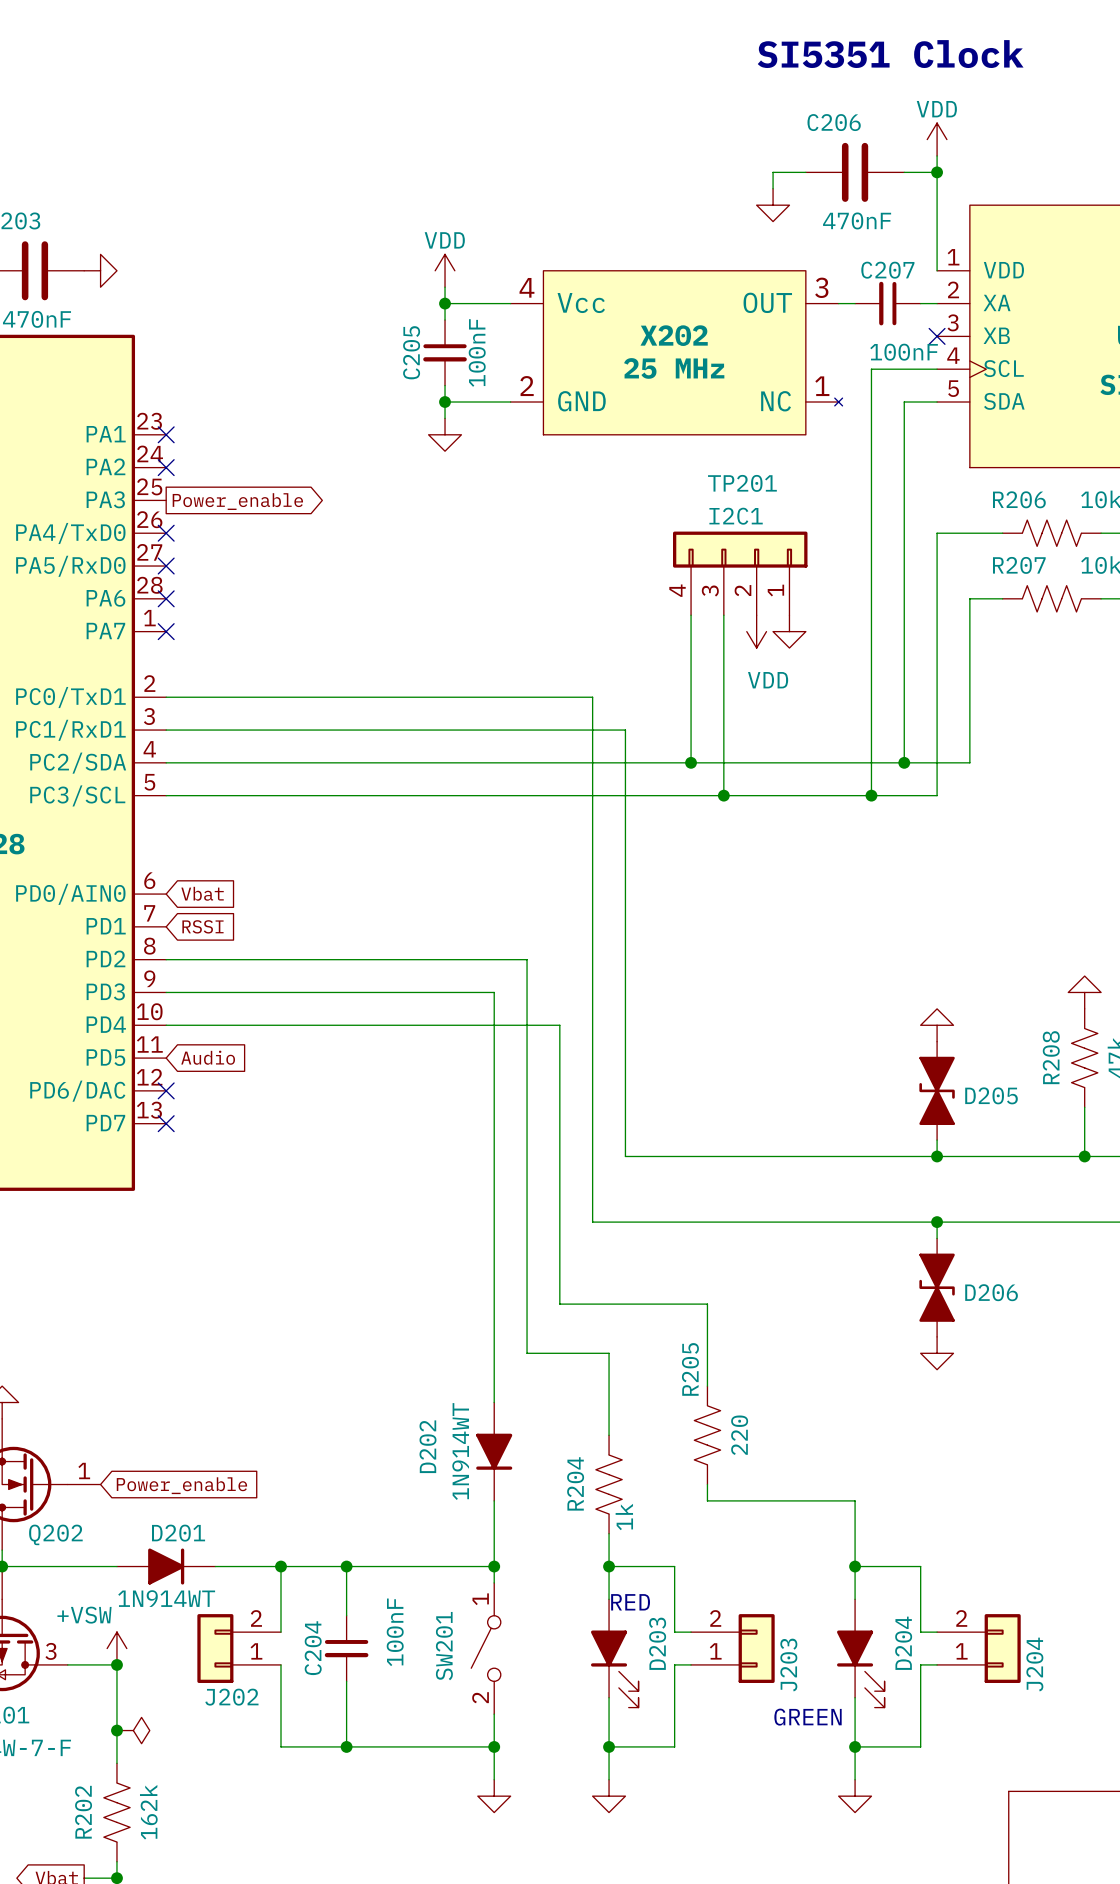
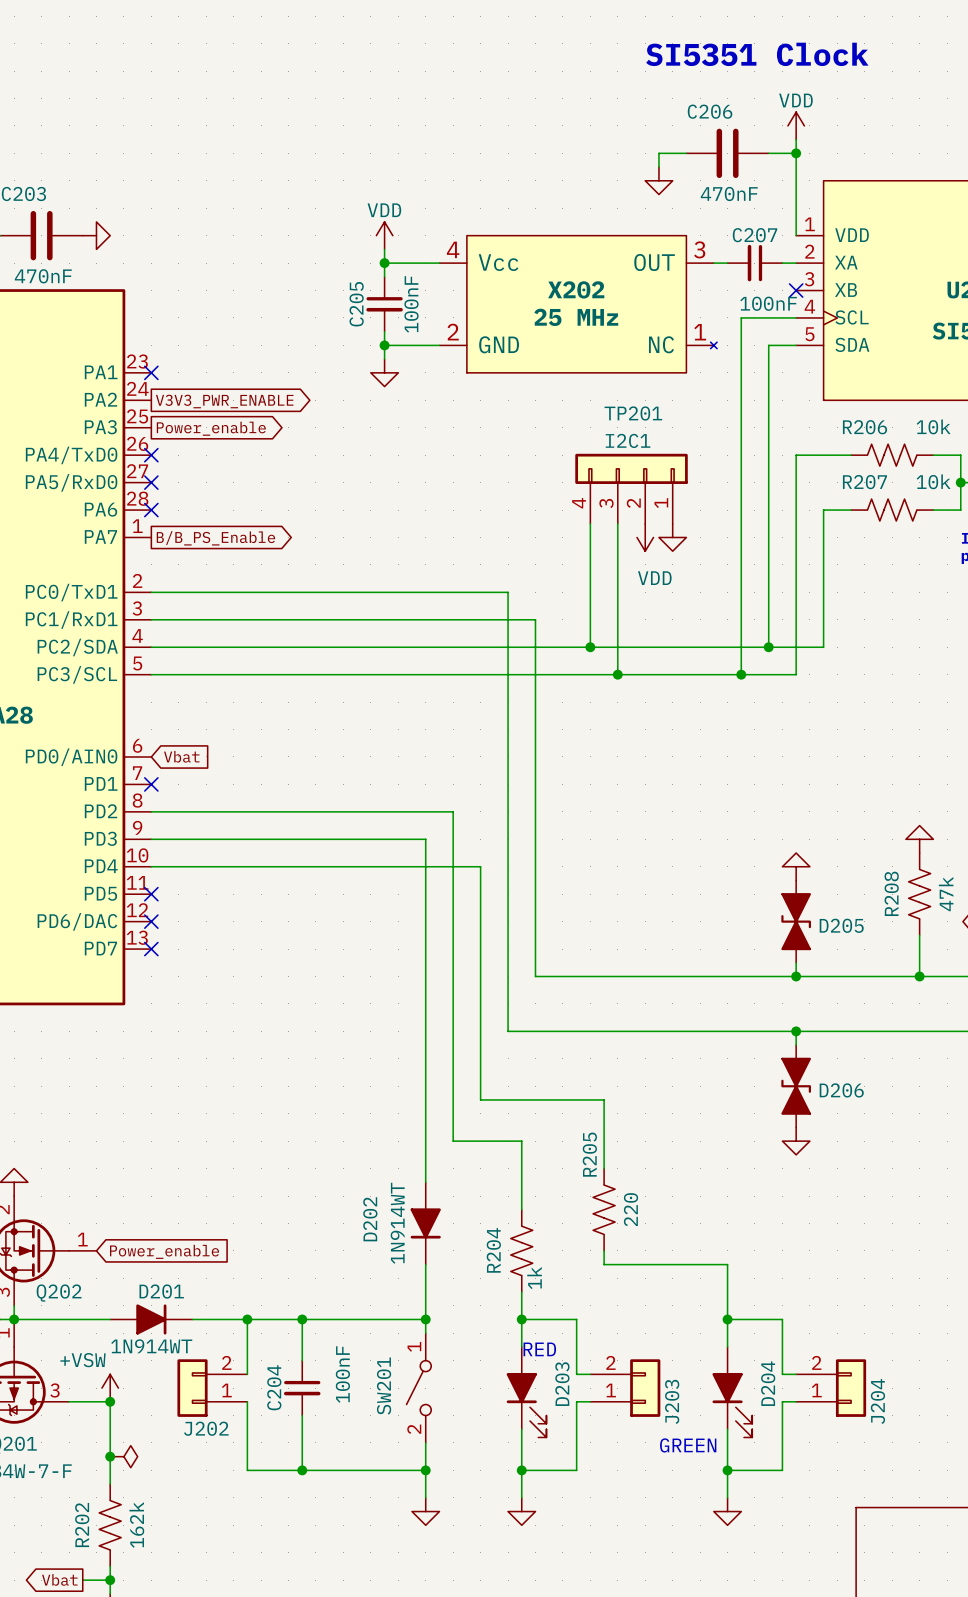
no-connect mark: (166, 467) -> none
global label: none -> V3V3_PWR_ENABLE (224, 401)
no-connect mark: (166, 631) -> none
global label: none -> B/B_PS_Enable (215, 538)
no-connect mark: none -> (151, 784)
global label: RSSI (202, 926) -> none
global label: Audio (208, 1057) -> none
no-connect mark: none -> (151, 894)

